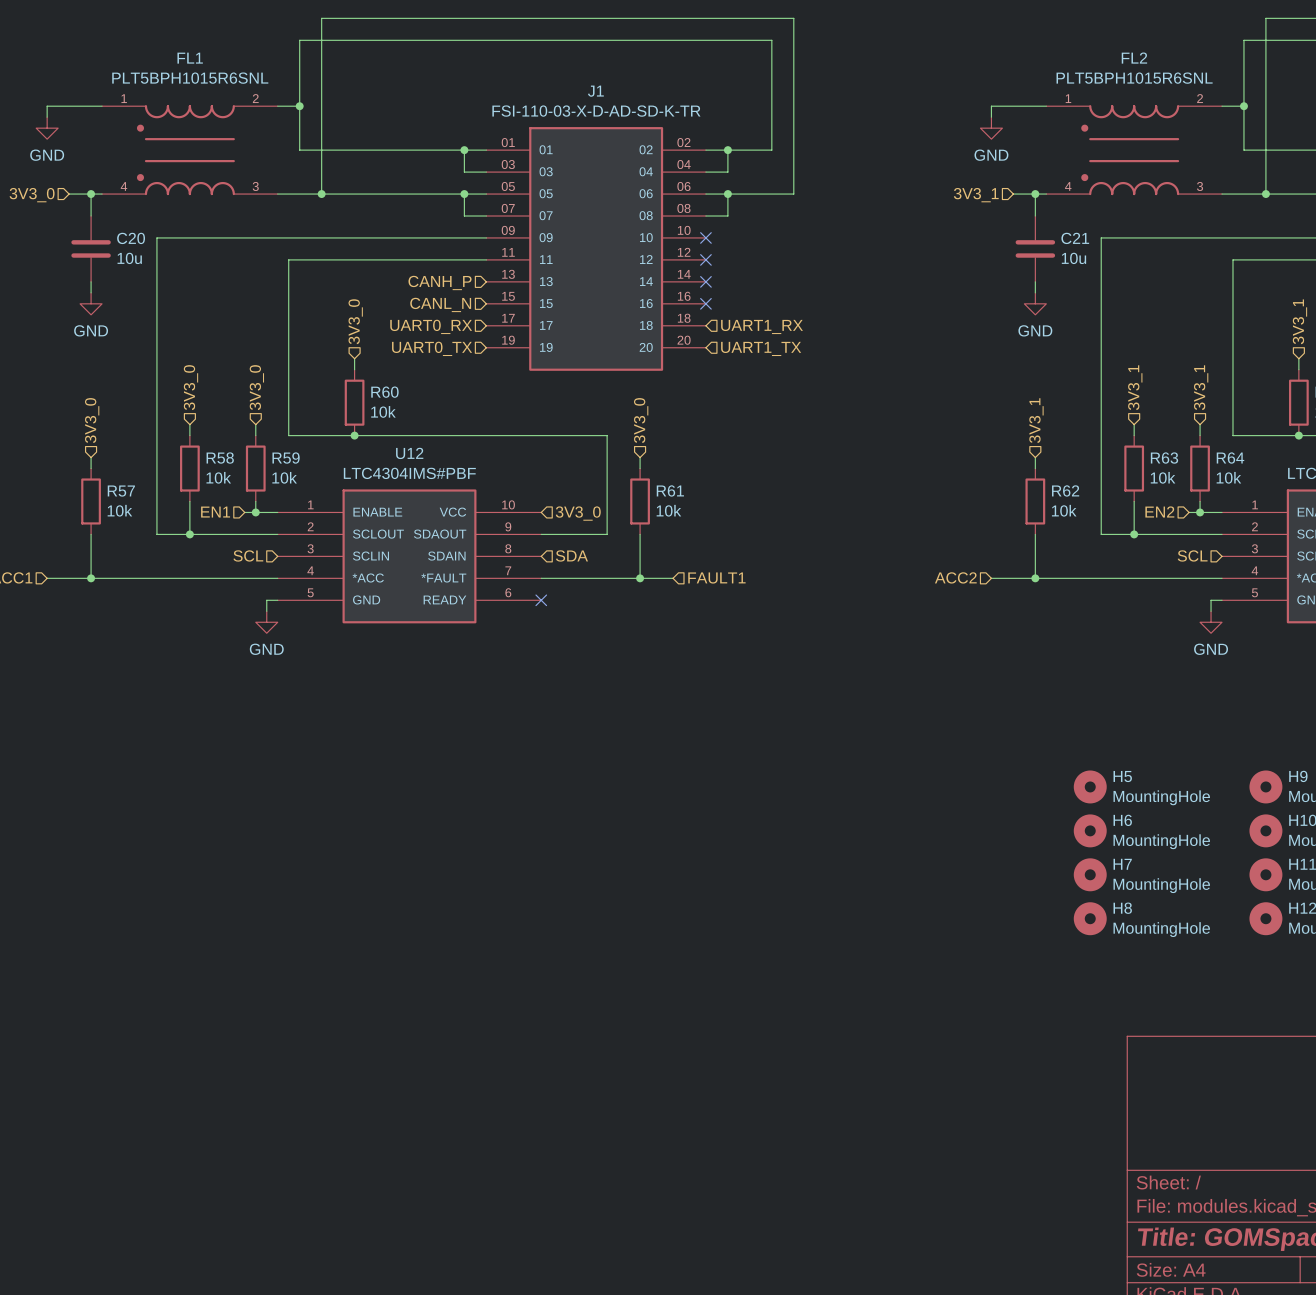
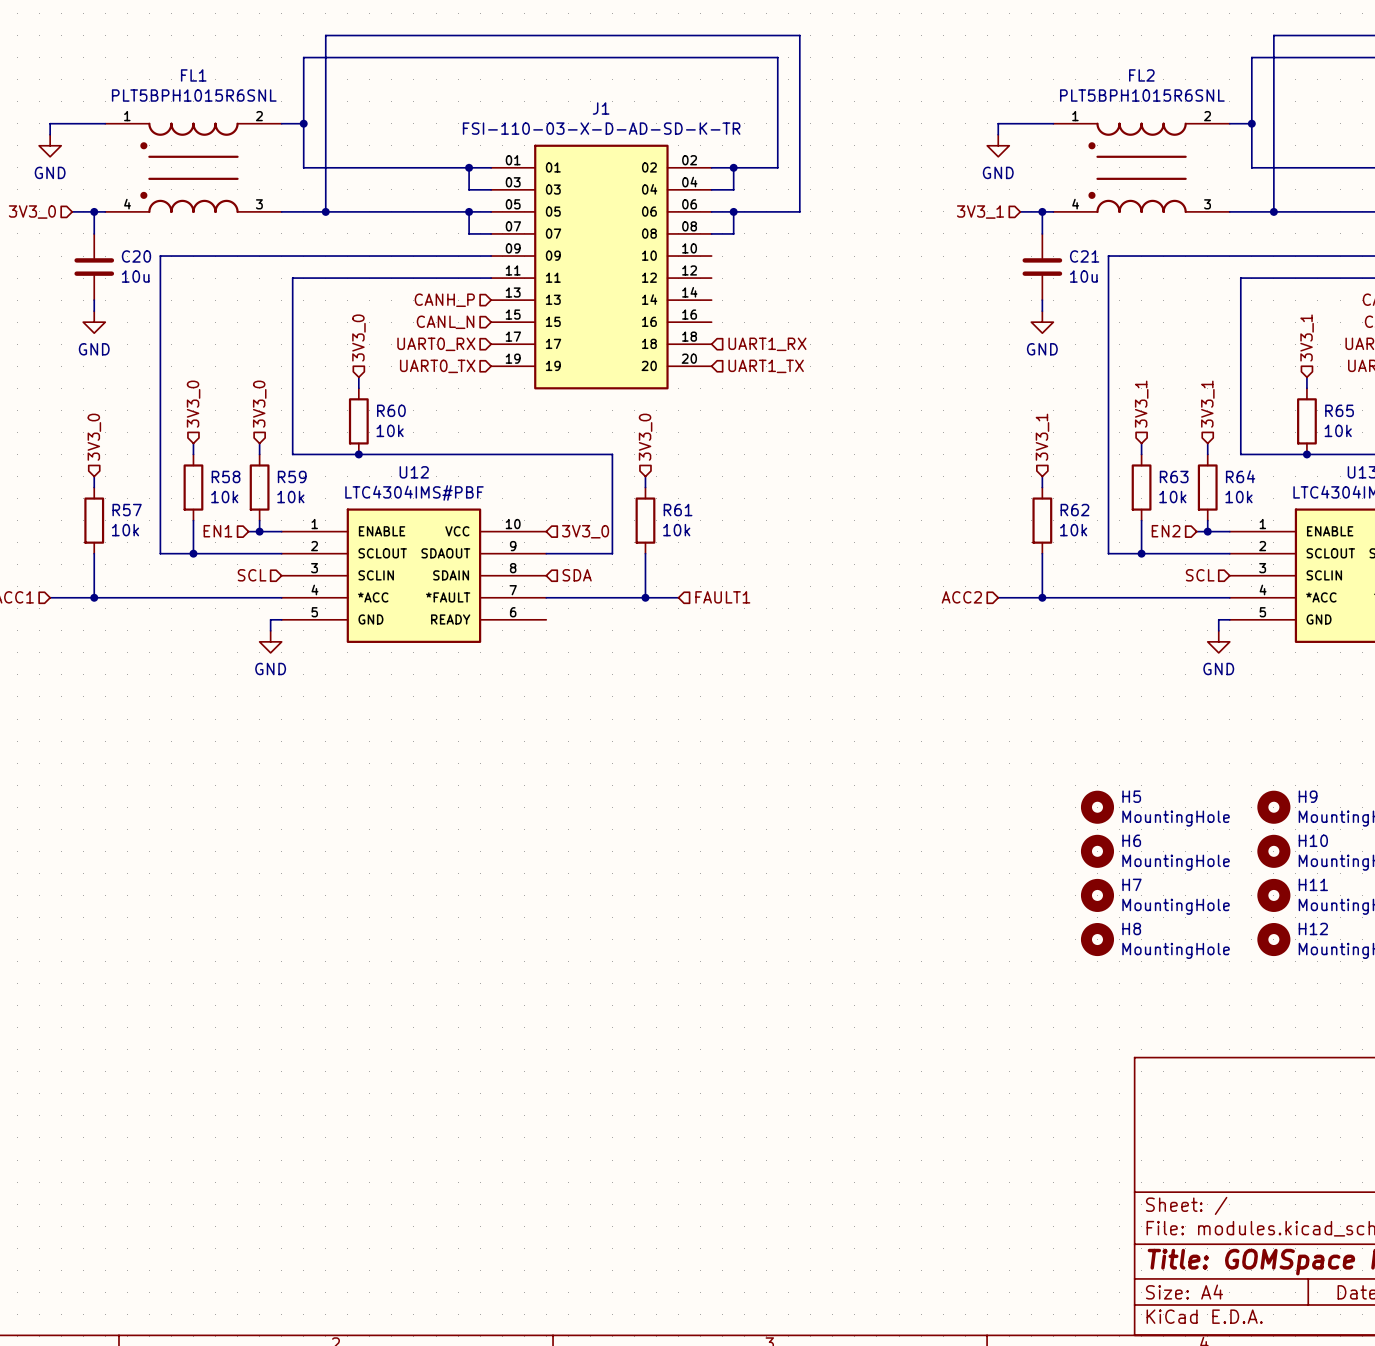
no-connect mark: (705, 237) -> none
no-connect mark: (705, 259) -> none
no-connect mark: (705, 281) -> none
no-connect mark: (705, 303) -> none
no-connect mark: (541, 600) -> none

